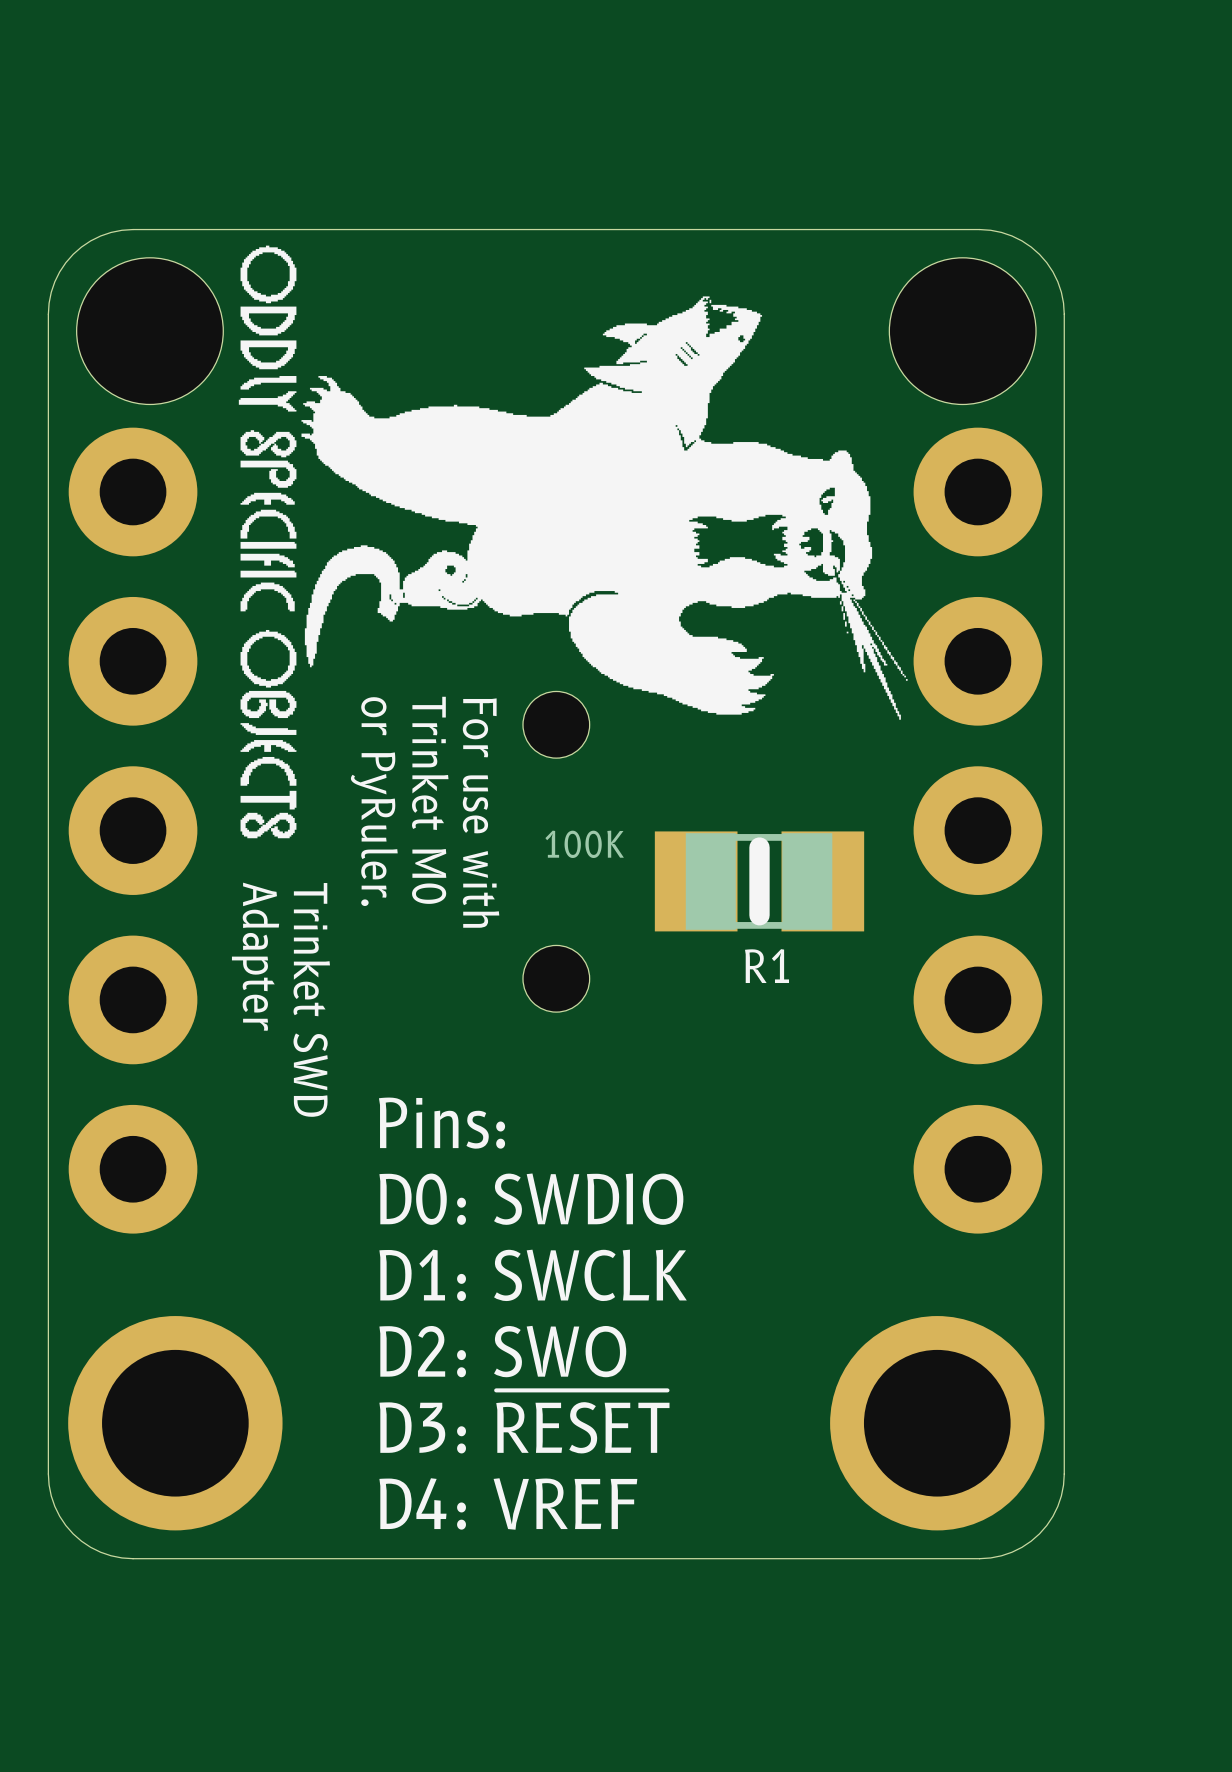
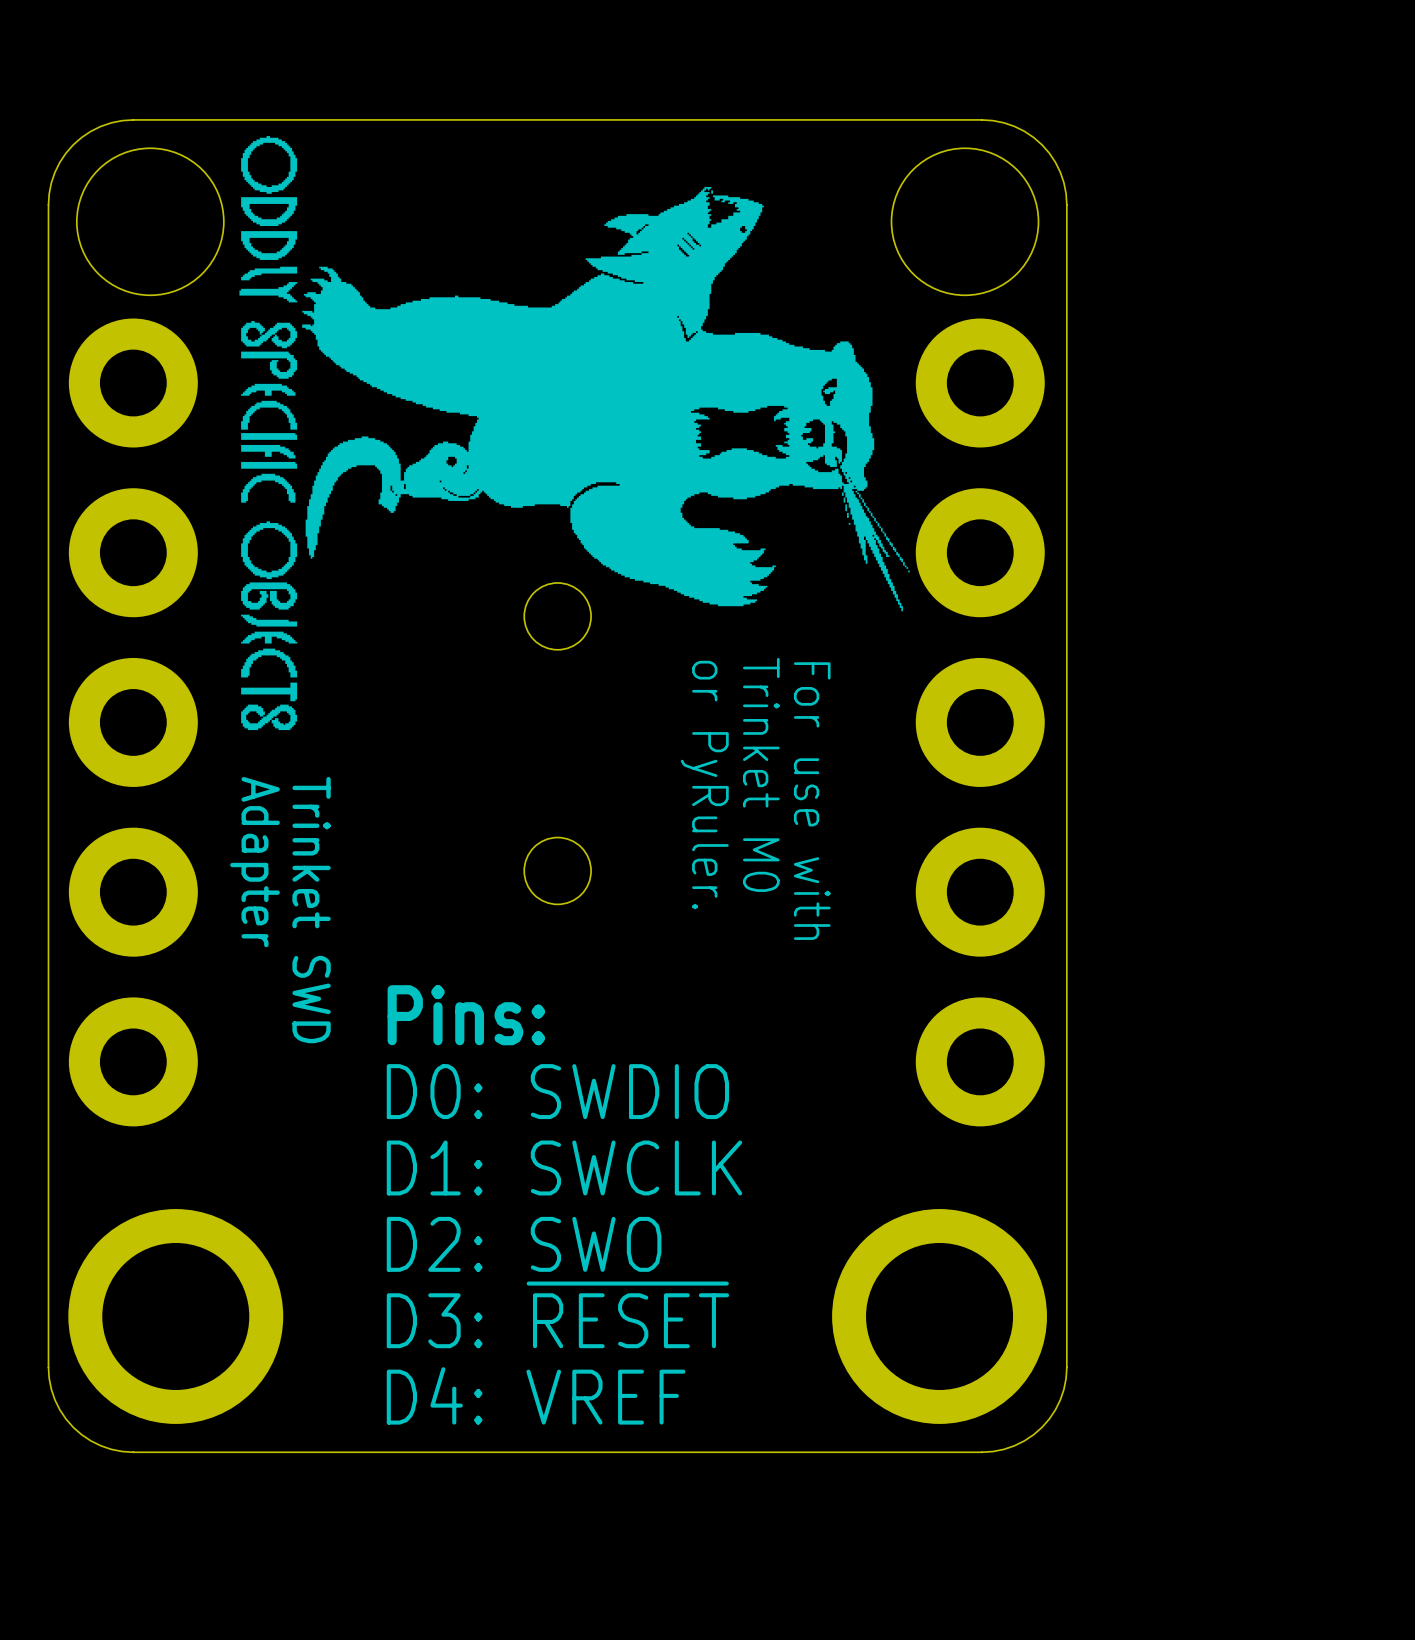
text position: Trinket M0 (430, 800) -> Trinket M0 (761, 774)
text position: or PyRuler. (374, 801) -> or PyRuler. (704, 785)
text position: For use with (481, 813) -> For use with (812, 801)
R1: 100K (759, 881) -> none

